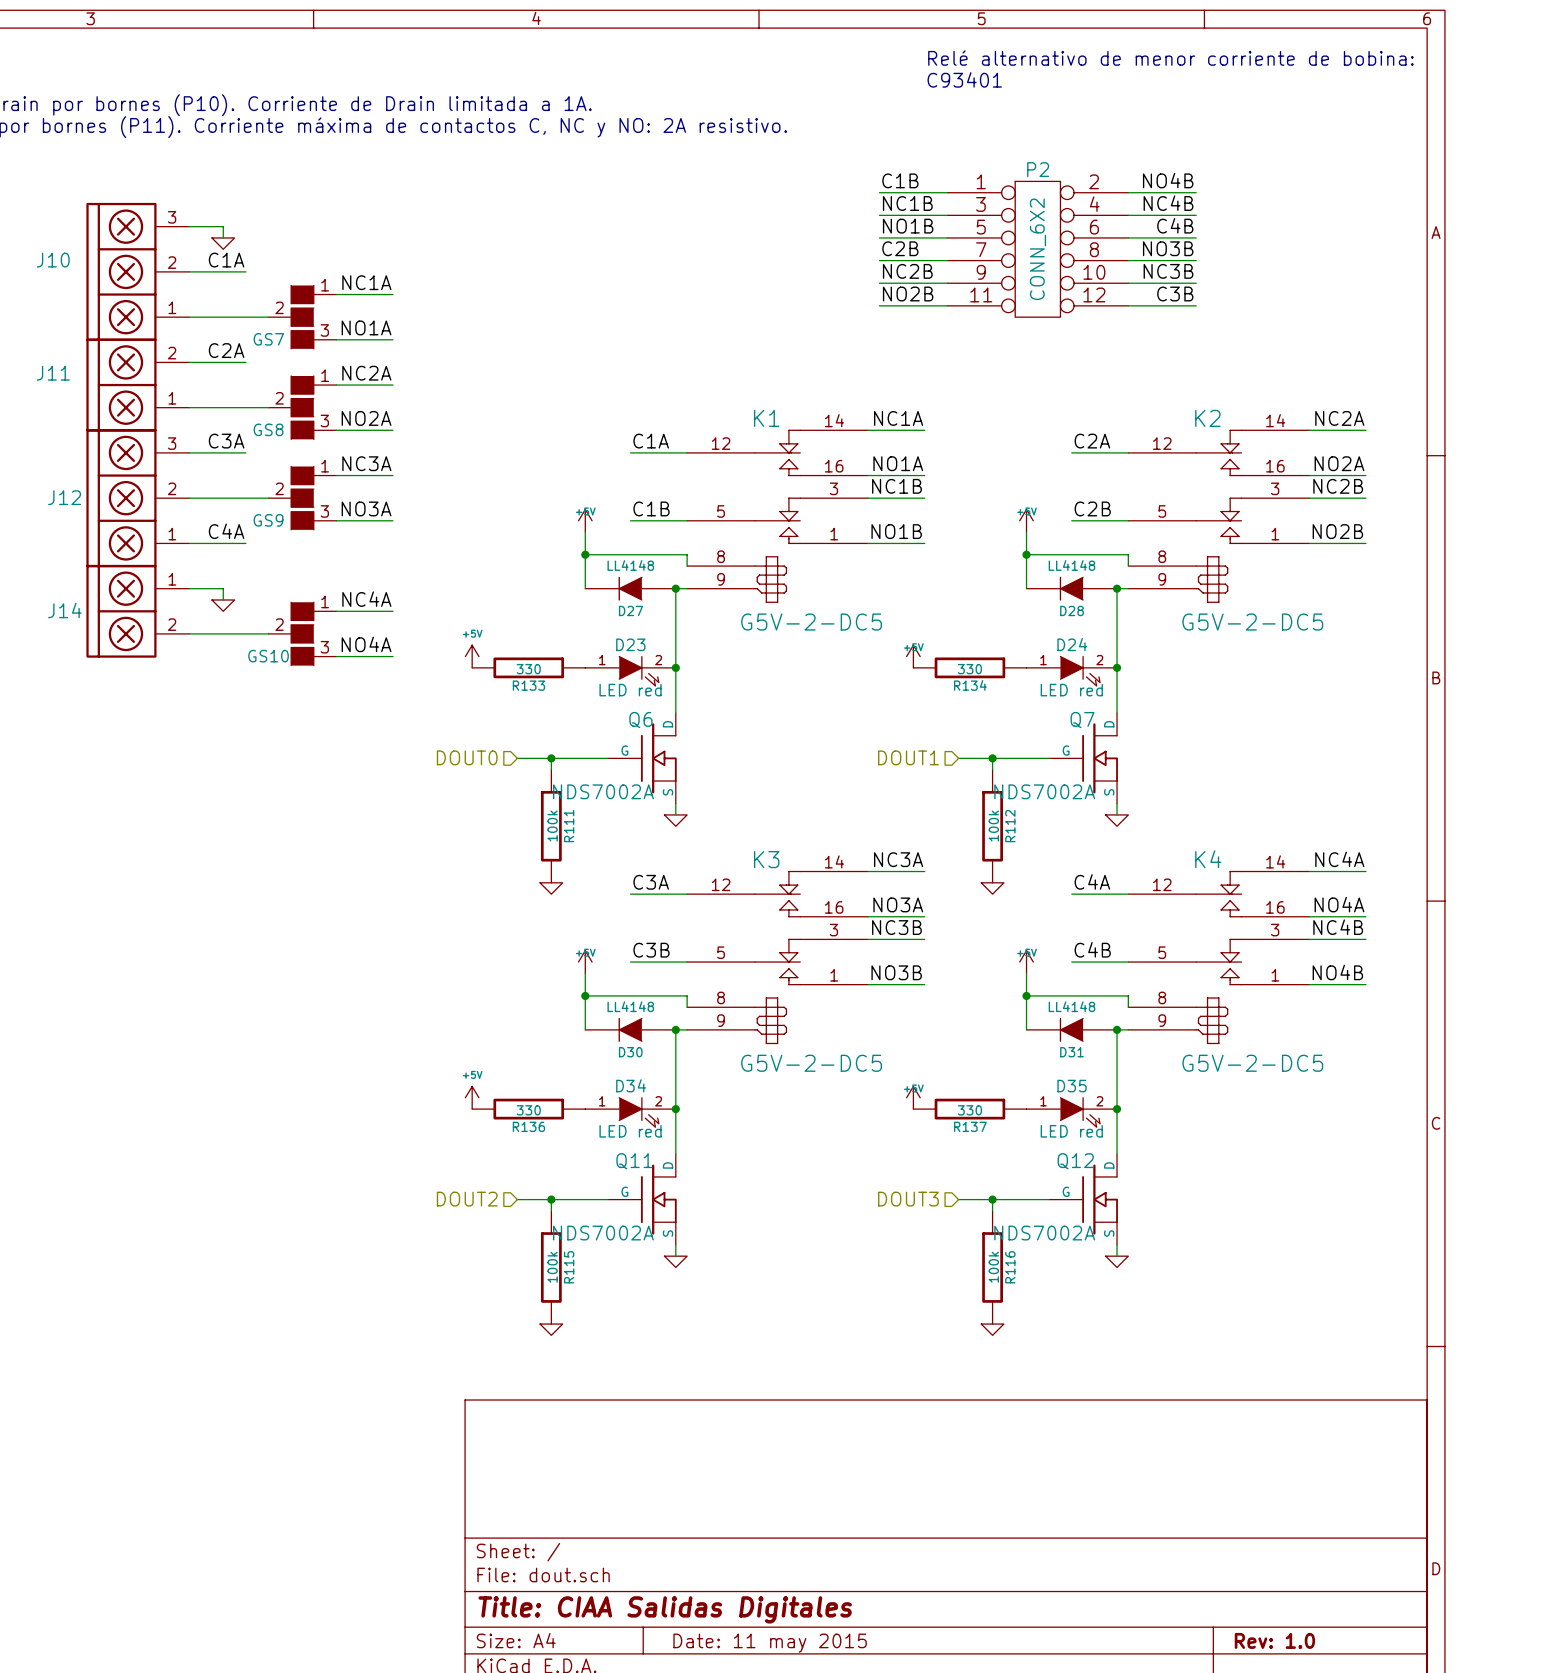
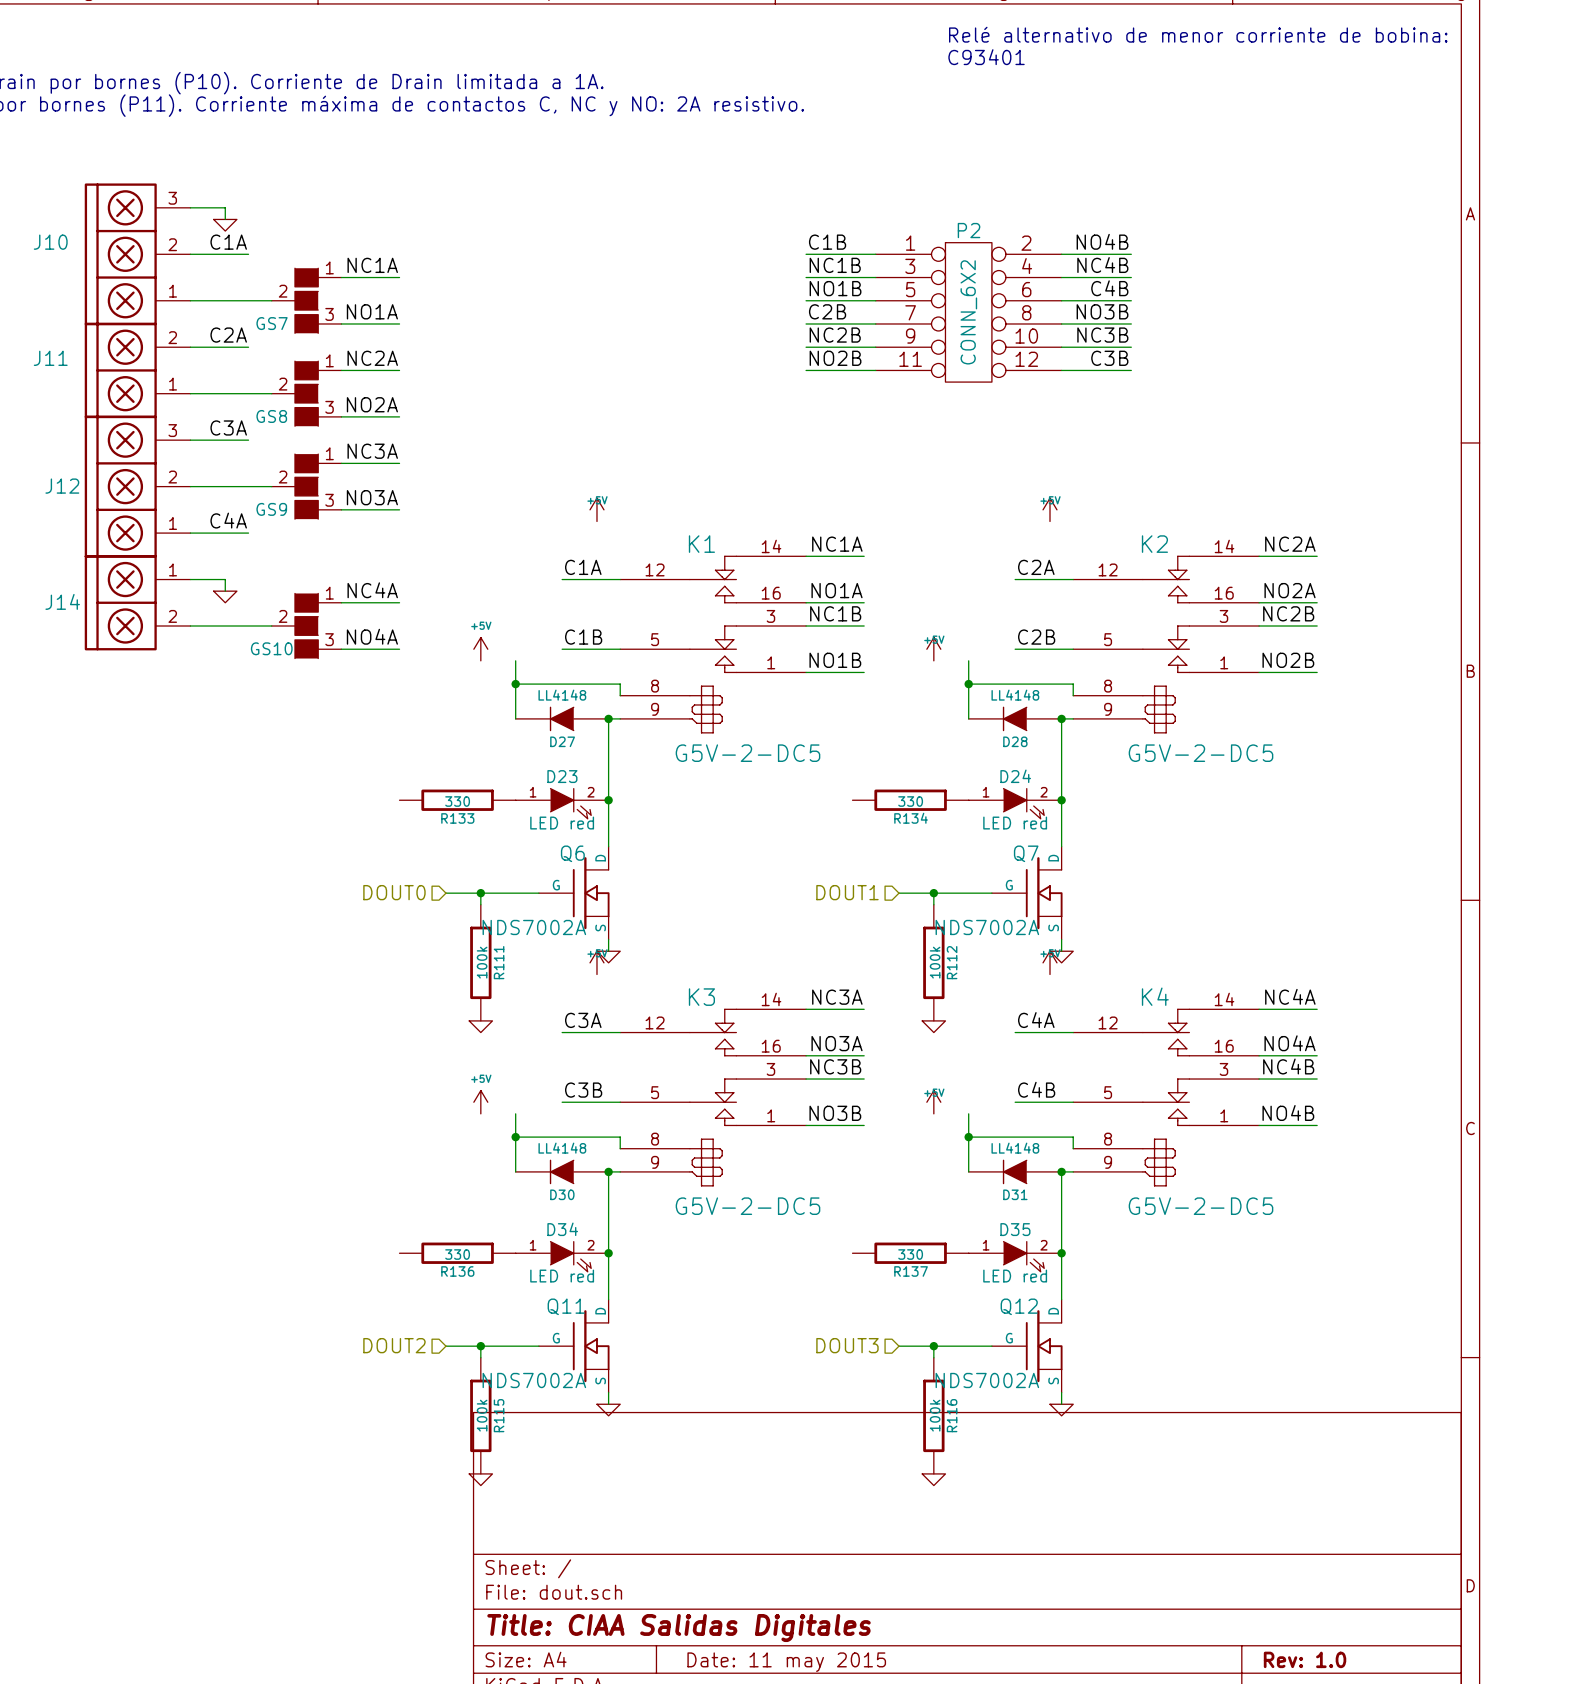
label position: C1B (900, 180) -> C1B (827, 242)
label position: NO4B (1168, 180) -> NO4B (1102, 241)
wire: (879, 192) (947, 192) -> (806, 254) (875, 254)
wire: (1128, 192) (1196, 192) -> (1061, 254) (1131, 254)
label position: NC1B (907, 203) -> NC1B (835, 265)
label position: NC4B (1168, 203) -> NC4B (1102, 265)
wire: (879, 215) (947, 215) -> (806, 277) (875, 277)
wire: (1128, 215) (1196, 215) -> (1061, 277) (1131, 277)
label position: C4B (1175, 225) -> C4B (1109, 288)
label position: NO1B (908, 226) -> NO1B (835, 288)
wire: (879, 237) (947, 237) -> (806, 300) (875, 300)
wire: (1128, 237) (1196, 237) -> (1061, 300) (1131, 300)
label position: C2B (900, 248) -> C2B (827, 311)
label position: NO3B (1168, 248) -> NO3B (1102, 311)
P2 position: (1037, 249) -> (968, 312)
wire: (879, 260) (947, 260) -> (806, 323) (875, 323)
wire: (1128, 260) (1196, 260) -> (1061, 323) (1131, 323)
label position: NC2B (907, 271) -> NC2B (835, 335)
label position: NC3B (1168, 271) -> NC3B (1102, 335)
wire: (879, 283) (947, 283) -> (806, 347) (875, 347)
wire: (1128, 283) (1196, 283) -> (1061, 347) (1131, 347)
label position: NO2B (908, 294) -> NO2B (835, 358)
label position: C3B (1175, 294) -> C3B (1109, 358)
wire: (879, 305) (947, 305) -> (806, 370) (875, 370)
wire: (1128, 305) (1196, 305) -> (1061, 370) (1131, 370)
label position: NC1A (898, 418) -> NC1A (837, 544)
label position: NC2A (1339, 418) -> NC2A (1290, 544)
wire: (868, 430) (924, 430) -> (806, 556) (864, 556)
wire: (1309, 430) (1365, 430) -> (1259, 556) (1317, 556)
label position: C1A (651, 441) -> C1A (583, 567)
label position: C2A (1092, 441) -> C2A (1036, 567)
wire: (630, 452) (687, 452) -> (562, 579) (620, 579)
wire: (1071, 452) (1128, 452) -> (1015, 579) (1073, 579)
label position: NO1A (898, 463) -> NO1A (837, 590)
label position: NO2A (1339, 463) -> NO2A (1290, 590)
wire: (868, 475) (924, 475) -> (806, 602) (864, 602)
wire: (1309, 475) (1365, 475) -> (1259, 602) (1317, 602)
label: NC1B (896, 486) -> none
label position: NC2B (1338, 486) -> NC2B (1288, 613)
wire: (868, 498) (924, 498) -> (806, 626) (864, 626)
wire: (1309, 498) (1365, 498) -> (1259, 626) (1317, 626)
label: C1B (651, 508) -> none
label position: C2B (1092, 508) -> C2B (1036, 637)
K1 position: (777, 516) -> (713, 644)
K2 position: (1218, 516) -> (1166, 644)
wire: (630, 520) (687, 520) -> (562, 649) (620, 649)
wire: (1071, 520) (1128, 520) -> (1015, 649) (1073, 649)
label: NO1B (896, 531) -> none
label position: NO2B (1337, 531) -> NO2B (1288, 660)
wire: (585, 532) (585, 588) -> (515, 660) (515, 718)
wire: (1026, 532) (1026, 588) -> (968, 660) (968, 718)
wire: (868, 543) (924, 543) -> (806, 672) (864, 672)
wire: (1309, 543) (1365, 543) -> (1259, 672) (1317, 672)
wire: (585, 554) (687, 554) (687, 566) -> (515, 684) (620, 684) (620, 695)
junction: (585, 554) -> none
wire: (1026, 554) (1128, 554) (1128, 566) -> (968, 684) (1073, 684) (1073, 695)
junction: (1026, 554) -> none
D27 position: (630, 588) -> (562, 718)
junction: (675, 588) -> none
wire: (687, 588) (675, 588) (675, 713) -> (620, 718) (608, 718) (608, 846)
D28 position: (1071, 588) -> (1015, 718)
junction: (1117, 588) -> none
wire: (1128, 588) (1117, 588) (1117, 713) -> (1073, 718) (1061, 718) (1061, 846)
label: none -> NC1B (835, 613)
label: none -> C1B (583, 637)
R133 position: (528, 667) -> (457, 800)
junction: (675, 667) -> none
label: none -> NO1B (835, 660)
R134 position: (969, 667) -> (910, 800)
junction: (1117, 667) -> none
D23 position: (630, 671) -> (562, 803)
D24 position: (1071, 671) -> (1015, 803)
junction: none -> (515, 684)
junction: none -> (968, 684)
junction: none -> (608, 718)
junction: none -> (1061, 718)
hierarchical label position: DOUT0 (467, 757) -> DOUT0 (394, 892)
hierarchical label position: DOUT1 (908, 757) -> DOUT1 (847, 892)
wire: (517, 758) (607, 758) -> (445, 893) (538, 893)
wire: (551, 758) (551, 769) -> (480, 893) (480, 904)
junction: (551, 758) -> none
Q6 position: (642, 758) -> (574, 893)
wire: (958, 758) (1049, 758) -> (898, 893) (991, 893)
wire: (992, 758) (992, 769) -> (933, 893) (933, 904)
junction: (992, 758) -> none
Q7 position: (1083, 758) -> (1027, 893)
junction: none -> (608, 800)
wire: (675, 803) (675, 814) -> (608, 939) (608, 951)
junction: none -> (1061, 800)
wire: (1117, 803) (1117, 814) -> (1061, 939) (1061, 951)
power symbol: (675, 820) -> none
power symbol: (1117, 820) -> none
R111 position: (551, 826) -> (480, 962)
R112 position: (992, 826) -> (933, 962)
label position: NC3A (898, 859) -> NC3A (837, 997)
label position: NC4A (1339, 859) -> NC4A (1290, 996)
wire: (868, 871) (924, 871) -> (806, 1009) (864, 1009)
wire: (1309, 871) (1365, 871) -> (1259, 1009) (1317, 1009)
label position: C4A (1092, 881) -> C4A (1036, 1020)
label position: C3A (651, 882) -> C3A (583, 1020)
power symbol: (551, 888) -> none
power symbol: (992, 888) -> none
junction: none -> (480, 893)
wire: (630, 894) (687, 894) -> (562, 1032) (620, 1032)
junction: none -> (933, 893)
wire: (1071, 894) (1128, 894) -> (1015, 1032) (1073, 1032)
label position: NO3A (898, 904) -> NO3A (837, 1043)
label position: NO4A (1339, 904) -> NO4A (1290, 1043)
wire: (868, 916) (924, 916) -> (806, 1055) (864, 1055)
wire: (1309, 916) (1365, 916) -> (1259, 1055) (1317, 1055)
label position: NC3B (896, 927) -> NC3B (835, 1066)
label position: NC4B (1338, 927) -> NC4B (1288, 1066)
wire: (868, 939) (924, 939) -> (806, 1079) (864, 1079)
wire: (1309, 939) (1365, 939) -> (1259, 1079) (1317, 1079)
label position: C4B (1092, 949) -> C4B (1036, 1089)
label position: C3B (651, 950) -> C3B (583, 1090)
power symbol: none -> (608, 957)
power symbol: none -> (1061, 957)
K3 position: (777, 957) -> (713, 1097)
K4 position: (1218, 957) -> (1166, 1097)
wire: (630, 962) (687, 962) -> (562, 1102) (620, 1102)
wire: (1071, 962) (1128, 962) -> (1015, 1102) (1073, 1102)
label position: NO3B (896, 972) -> NO3B (835, 1113)
label position: NO4B (1337, 972) -> NO4B (1288, 1112)
wire: (585, 973) (585, 1029) -> (515, 1113) (515, 1171)
wire: (1026, 973) (1026, 1029) -> (968, 1113) (968, 1171)
wire: (868, 984) (924, 984) -> (806, 1125) (864, 1125)
wire: (1309, 984) (1365, 984) -> (1259, 1125) (1317, 1125)
wire: (585, 995) (687, 995) (687, 1007) -> (515, 1137) (620, 1137) (620, 1148)
junction: (585, 995) -> none
wire: (1026, 995) (1128, 995) (1128, 1007) -> (968, 1137) (1073, 1137) (1073, 1148)
junction: (1026, 995) -> none
power symbol: none -> (480, 1026)
power symbol: none -> (933, 1026)
D30 position: (630, 1029) -> (562, 1171)
junction: (675, 1029) -> none
wire: (687, 1029) (675, 1029) (675, 1154) -> (620, 1171) (608, 1171) (608, 1299)
D31 position: (1071, 1029) -> (1015, 1171)
junction: (1117, 1029) -> none
wire: (1128, 1029) (1117, 1029) (1117, 1154) -> (1073, 1171) (1061, 1171) (1061, 1299)
R136 position: (528, 1109) -> (457, 1253)
junction: (675, 1109) -> none
R137 position: (969, 1109) -> (910, 1253)
junction: (1117, 1109) -> none
D34 position: (630, 1112) -> (562, 1256)
D35 position: (1071, 1112) -> (1015, 1256)
junction: none -> (515, 1137)
junction: none -> (968, 1137)
junction: none -> (608, 1171)
junction: none -> (1061, 1171)
hierarchical label position: DOUT2 (467, 1199) -> DOUT2 (394, 1345)
wire: (517, 1199) (607, 1199) -> (445, 1346) (538, 1346)
wire: (551, 1199) (551, 1210) -> (480, 1346) (480, 1357)
junction: (551, 1199) -> none
Q11 position: (642, 1199) -> (574, 1346)
hierarchical label position: DOUT3 (908, 1199) -> DOUT3 (847, 1345)
wire: (958, 1199) (1049, 1199) -> (898, 1346) (991, 1346)
wire: (992, 1199) (992, 1210) -> (933, 1346) (933, 1357)
junction: (992, 1199) -> none
Q12 position: (1083, 1199) -> (1027, 1346)
junction: none -> (608, 1253)
wire: (675, 1244) (675, 1256) -> (608, 1392) (608, 1404)
junction: none -> (1061, 1253)
wire: (1117, 1244) (1117, 1256) -> (1061, 1392) (1061, 1404)
power symbol: (675, 1261) -> none
power symbol: (1117, 1261) -> none
R115 position: (551, 1267) -> (480, 1415)
R116 position: (992, 1267) -> (933, 1415)
power symbol: (551, 1329) -> none
power symbol: (992, 1329) -> none
junction: none -> (480, 1346)
junction: none -> (933, 1346)
power symbol: none -> (608, 1410)
power symbol: none -> (1061, 1410)
power symbol: none -> (480, 1479)
power symbol: none -> (933, 1479)

